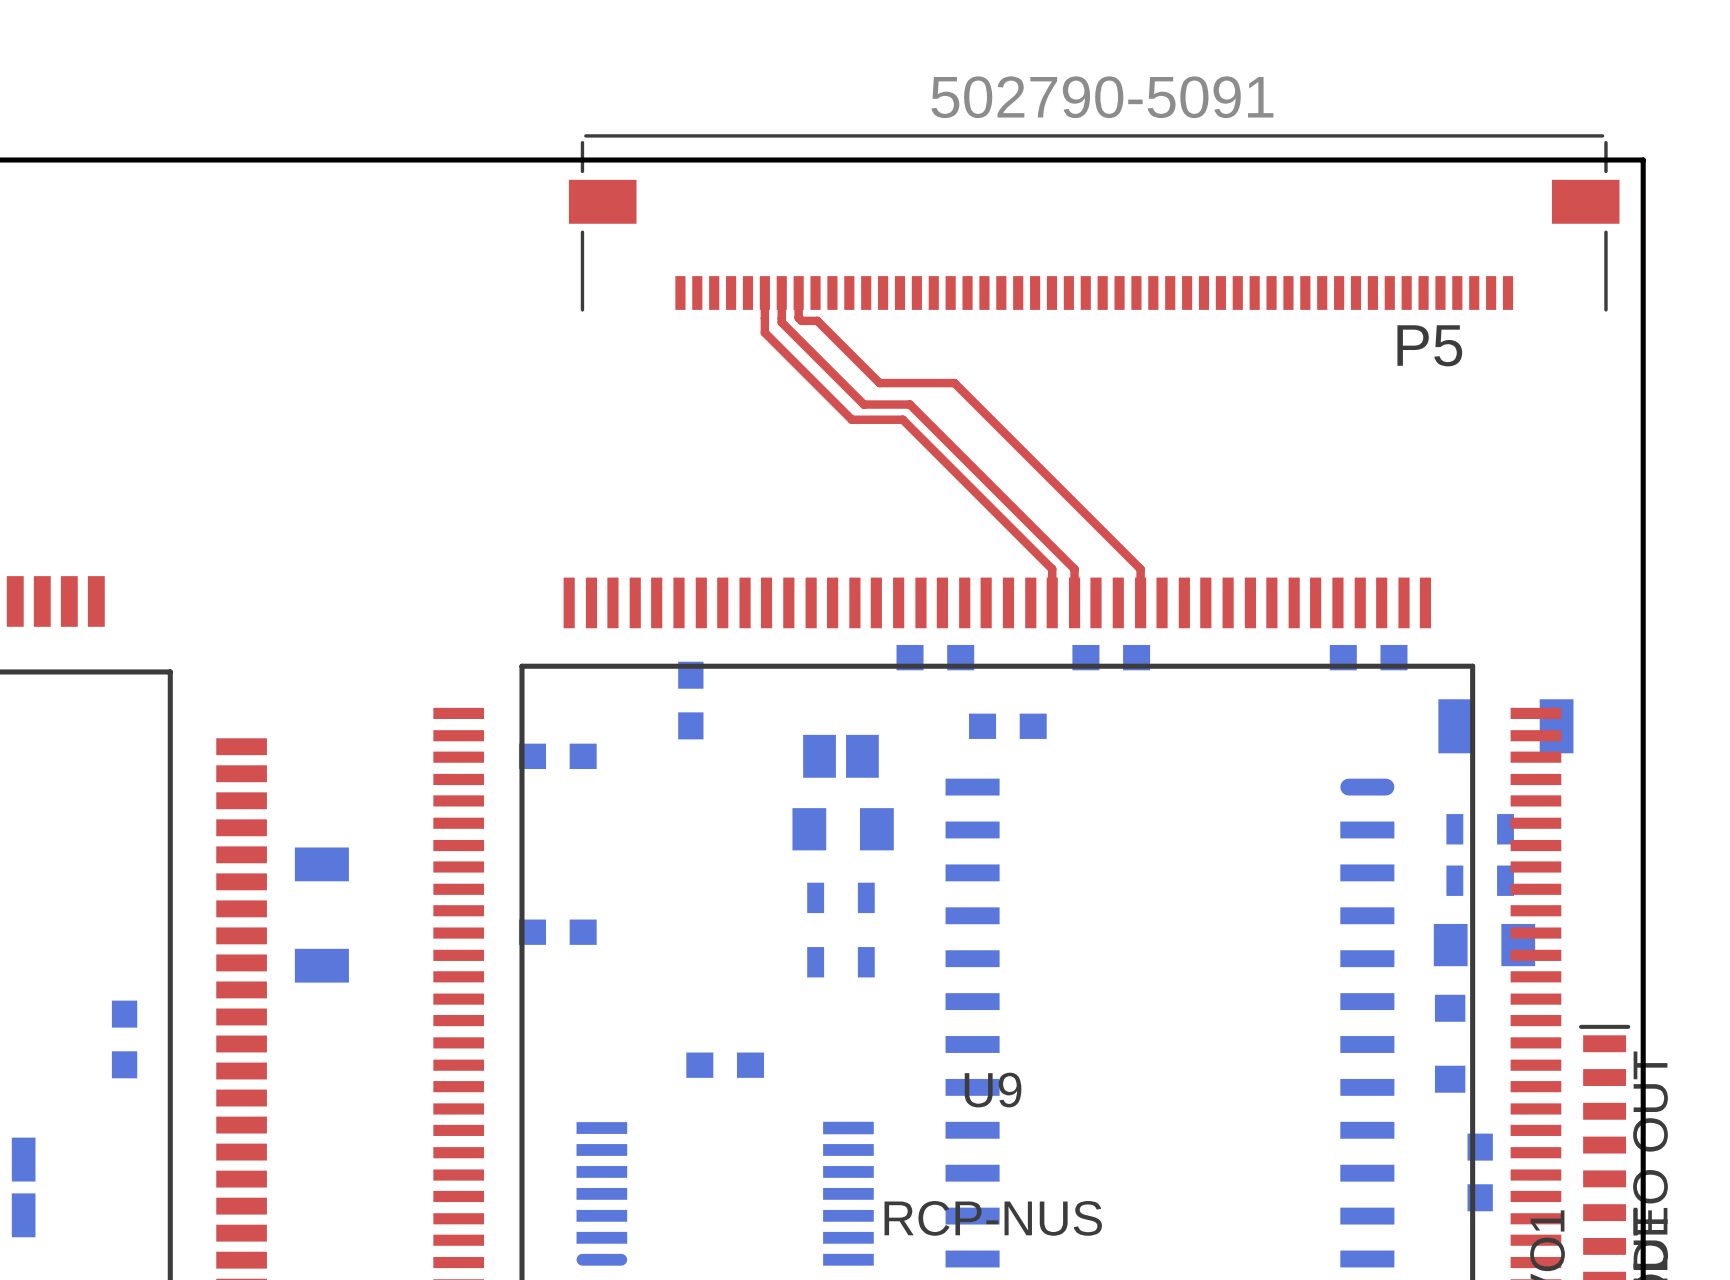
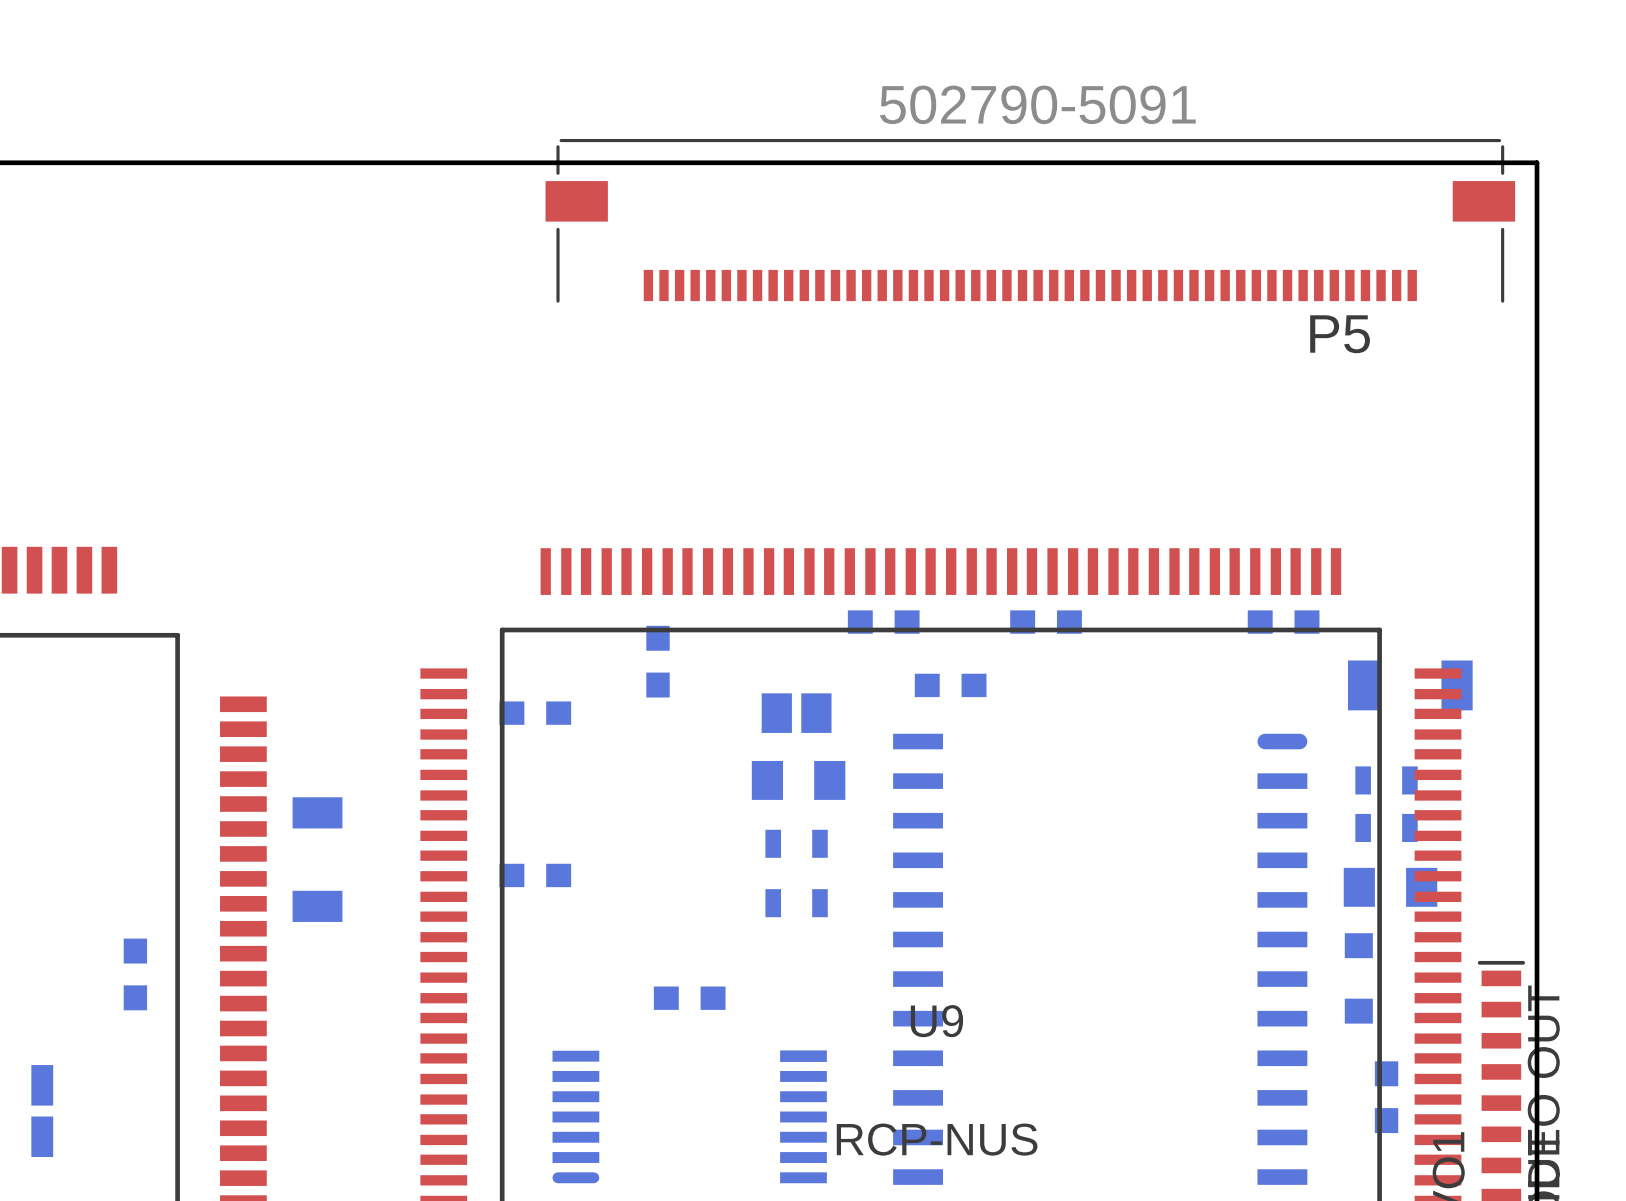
top track: (764, 293) (764, 332) (851, 419) (902, 419) (1052, 569) (1052, 602) -> none
top track: (781, 293) (781, 322) (863, 404) (909, 404) (1074, 569) (1074, 602) -> none
top track: (798, 293) (798, 317) (801, 320) (817, 320) (879, 383) (954, 383) (1140, 569) (1140, 602) -> none

